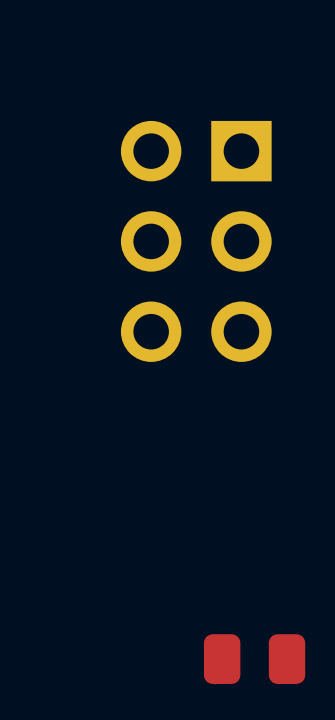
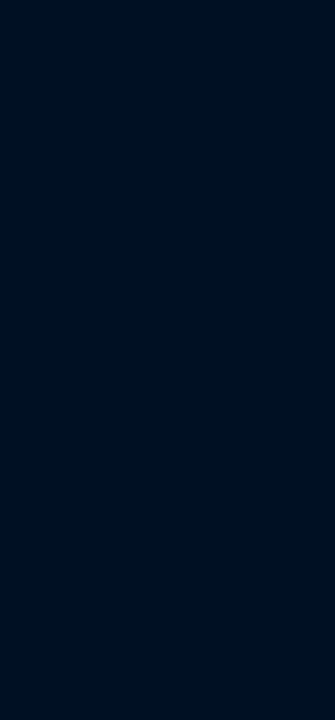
part: (196, 241) -> none
part: (254, 659) -> none

